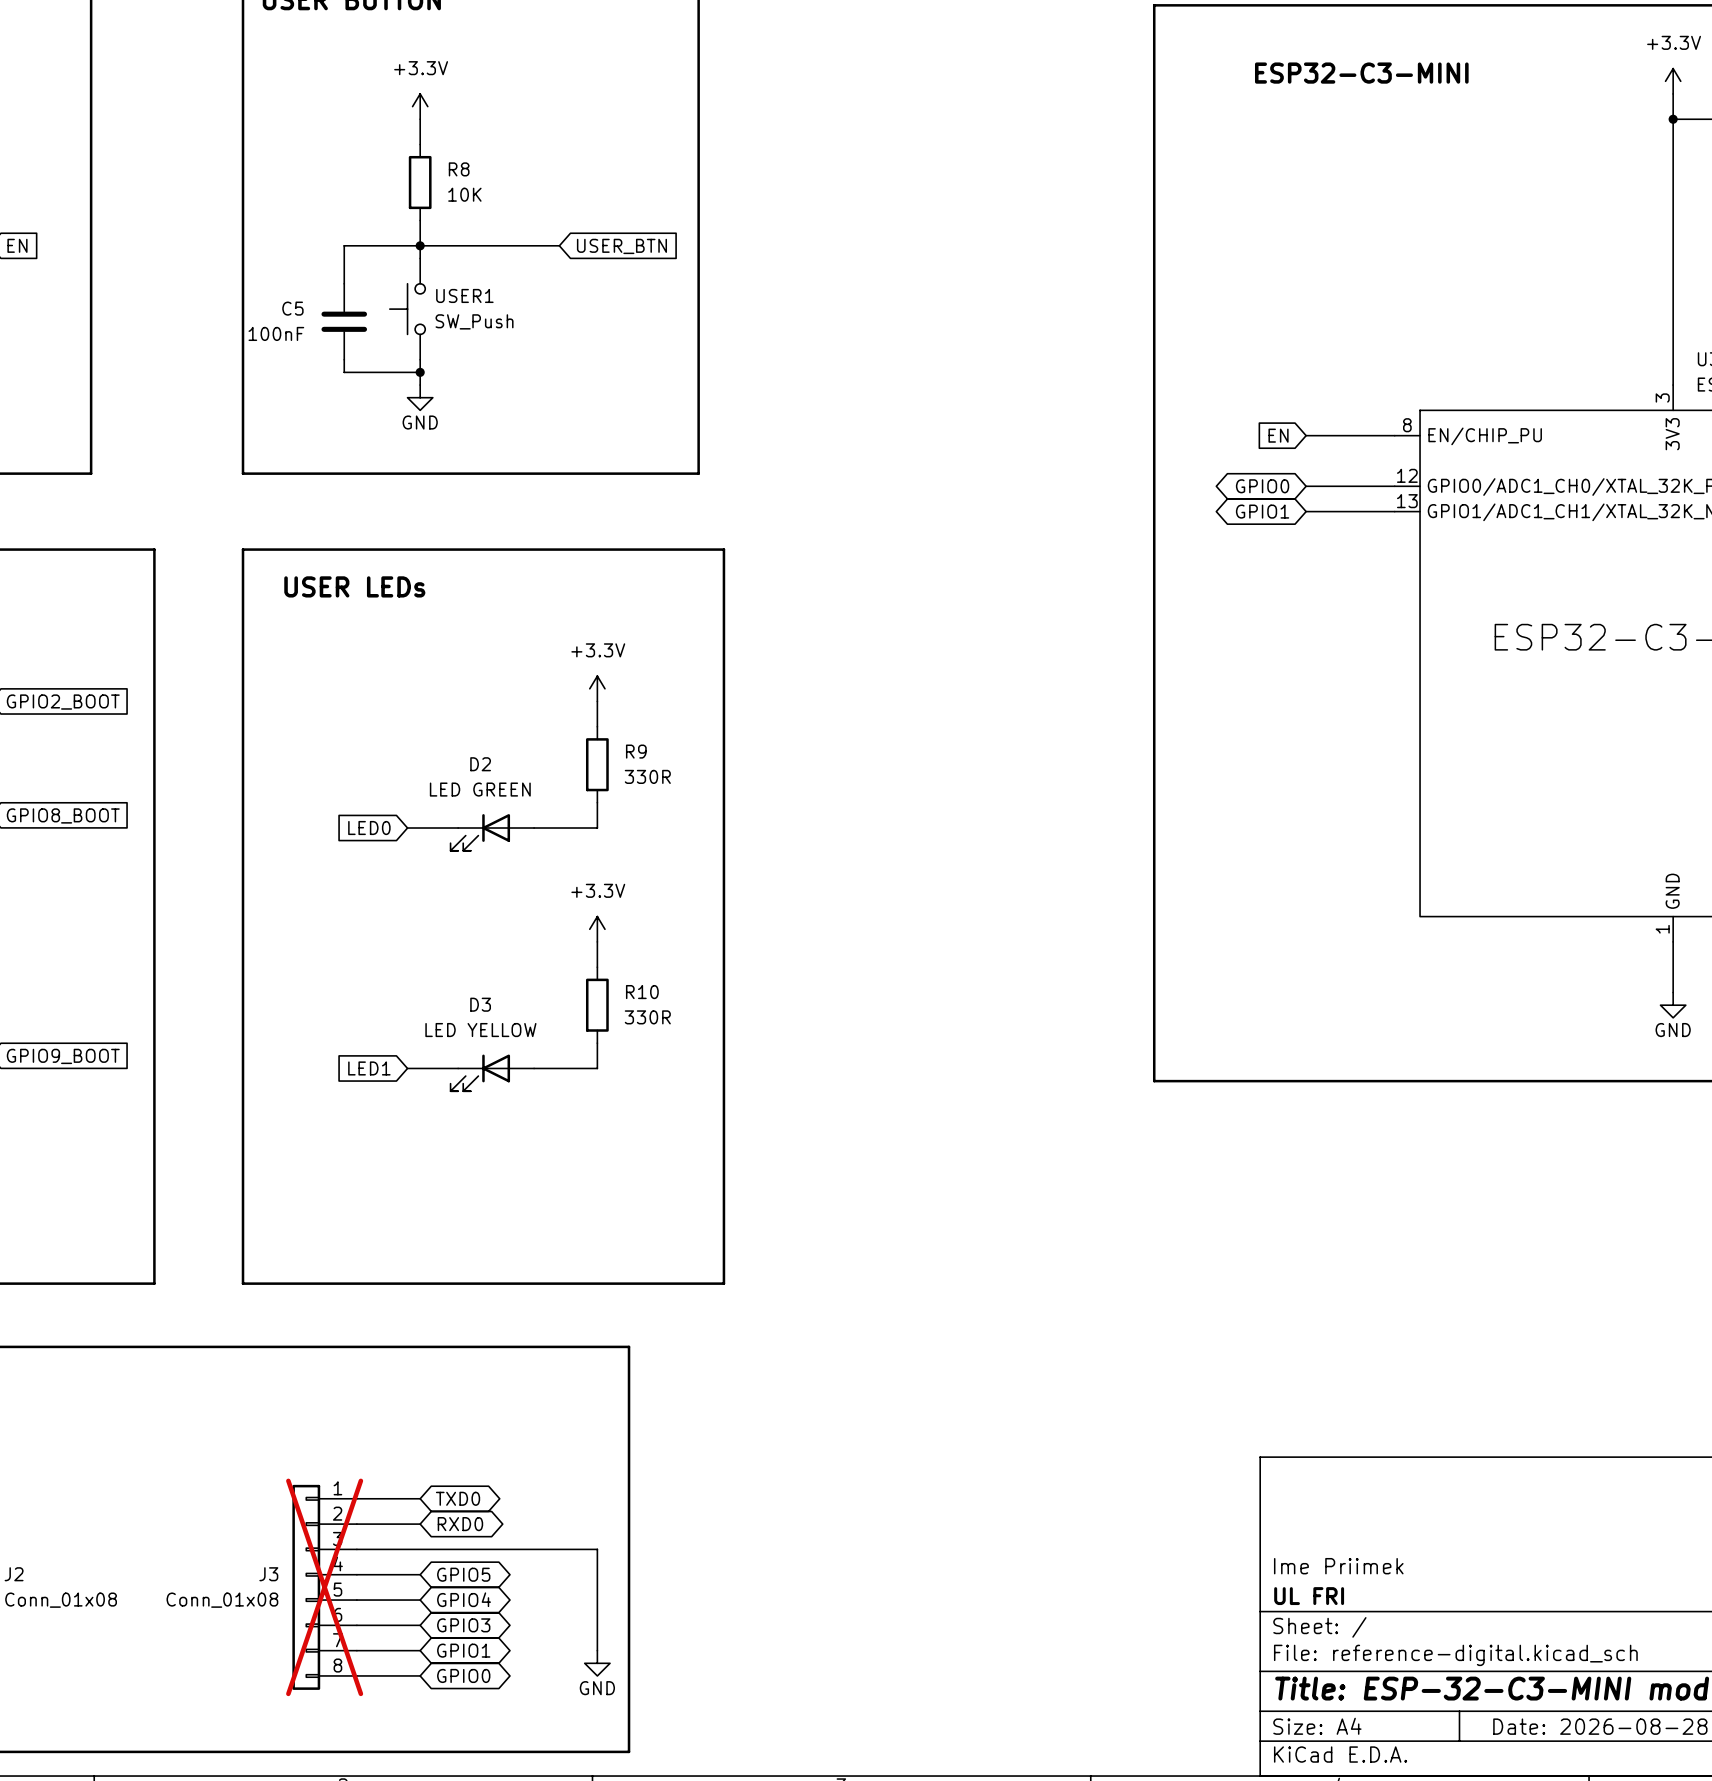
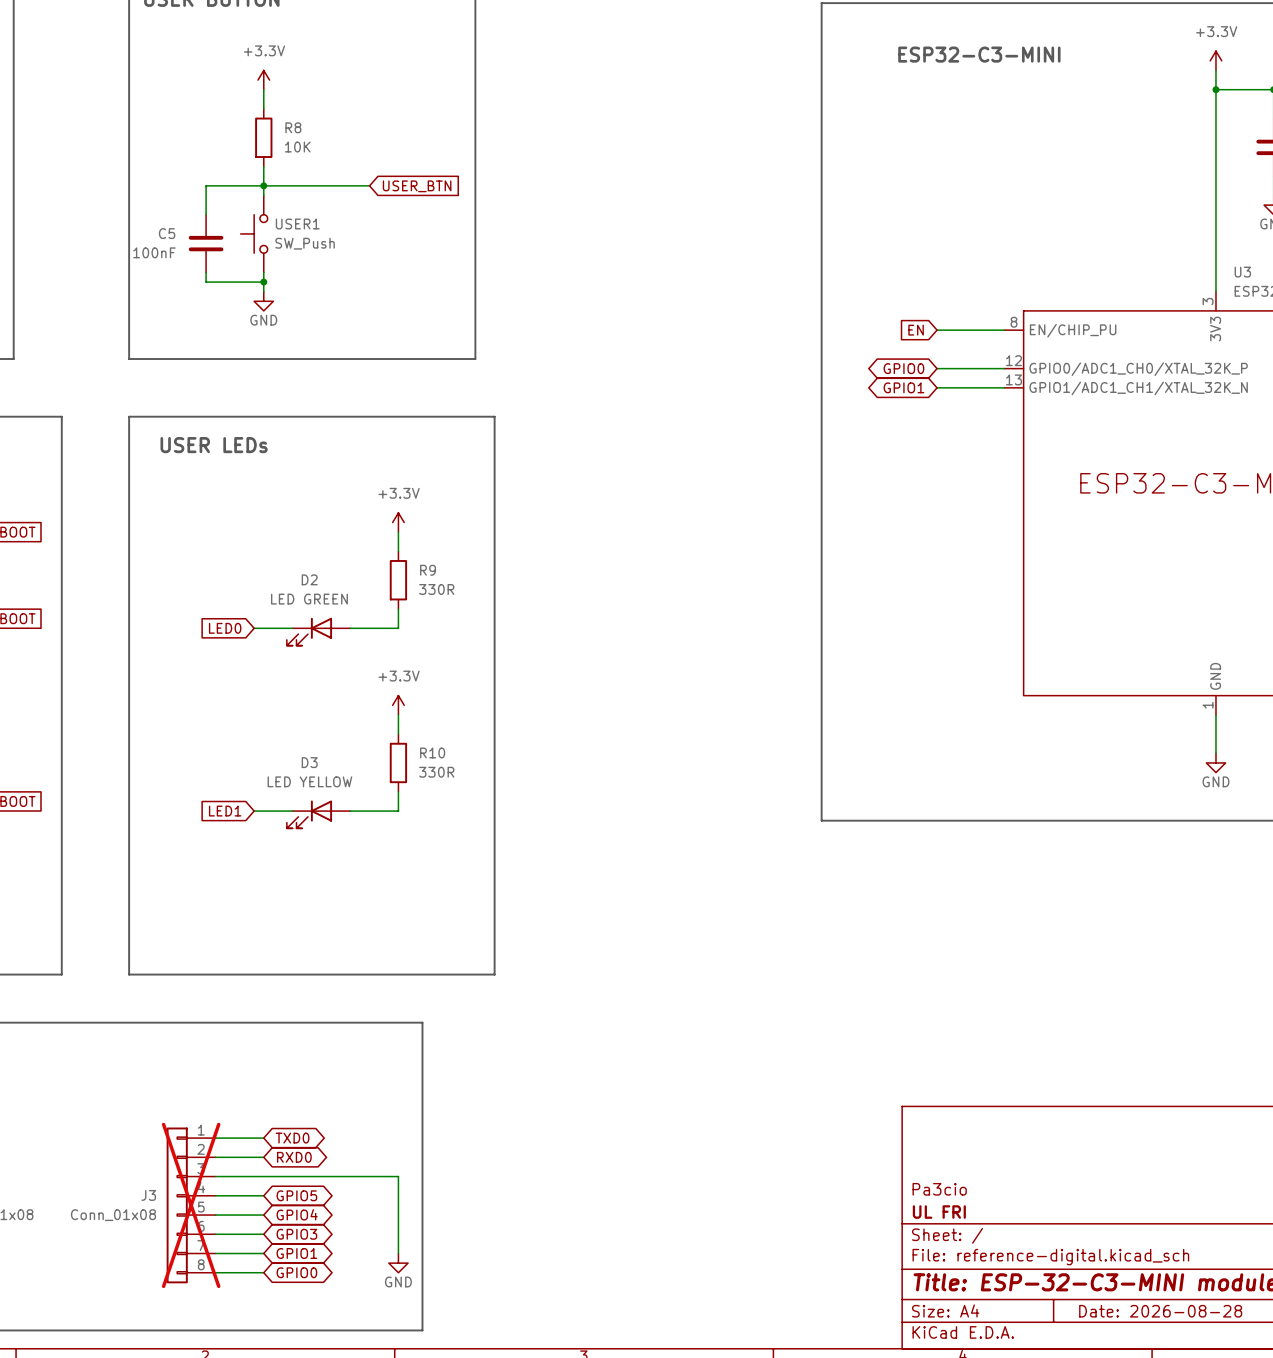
title block: Ime Priimek (1338, 1566) -> Pa3cio (939, 1189)

